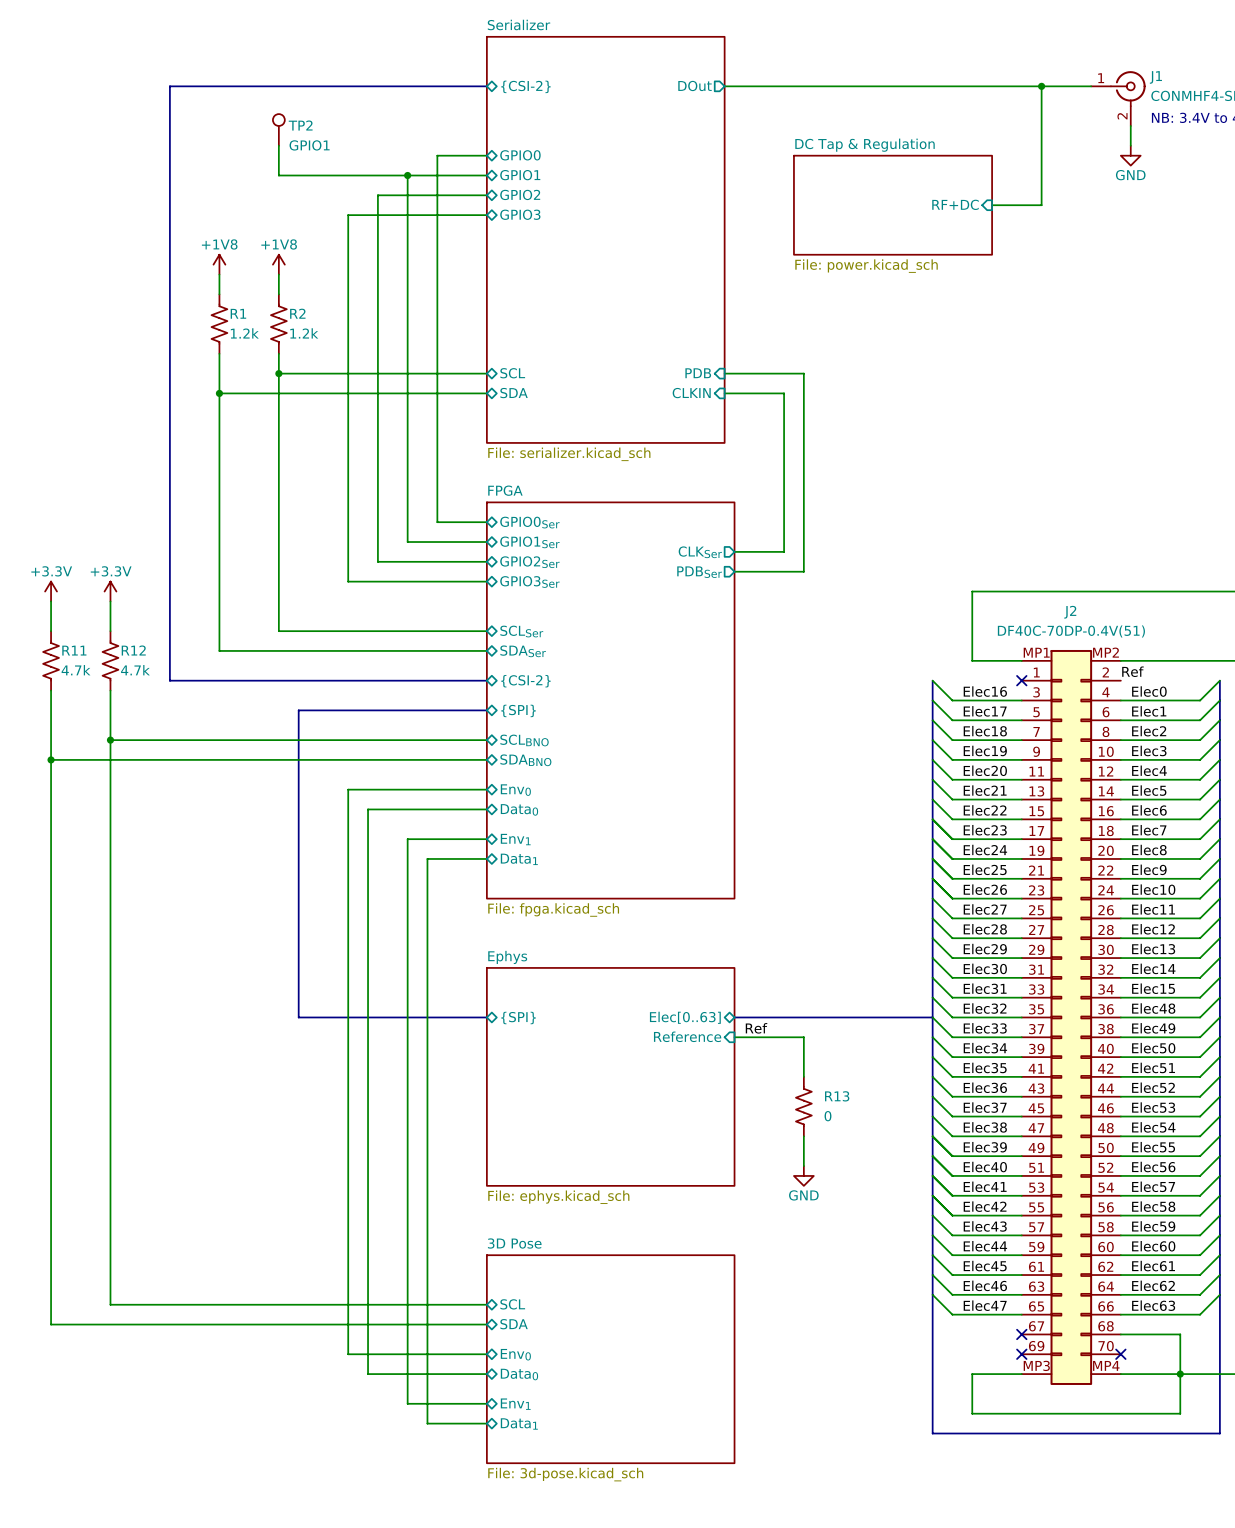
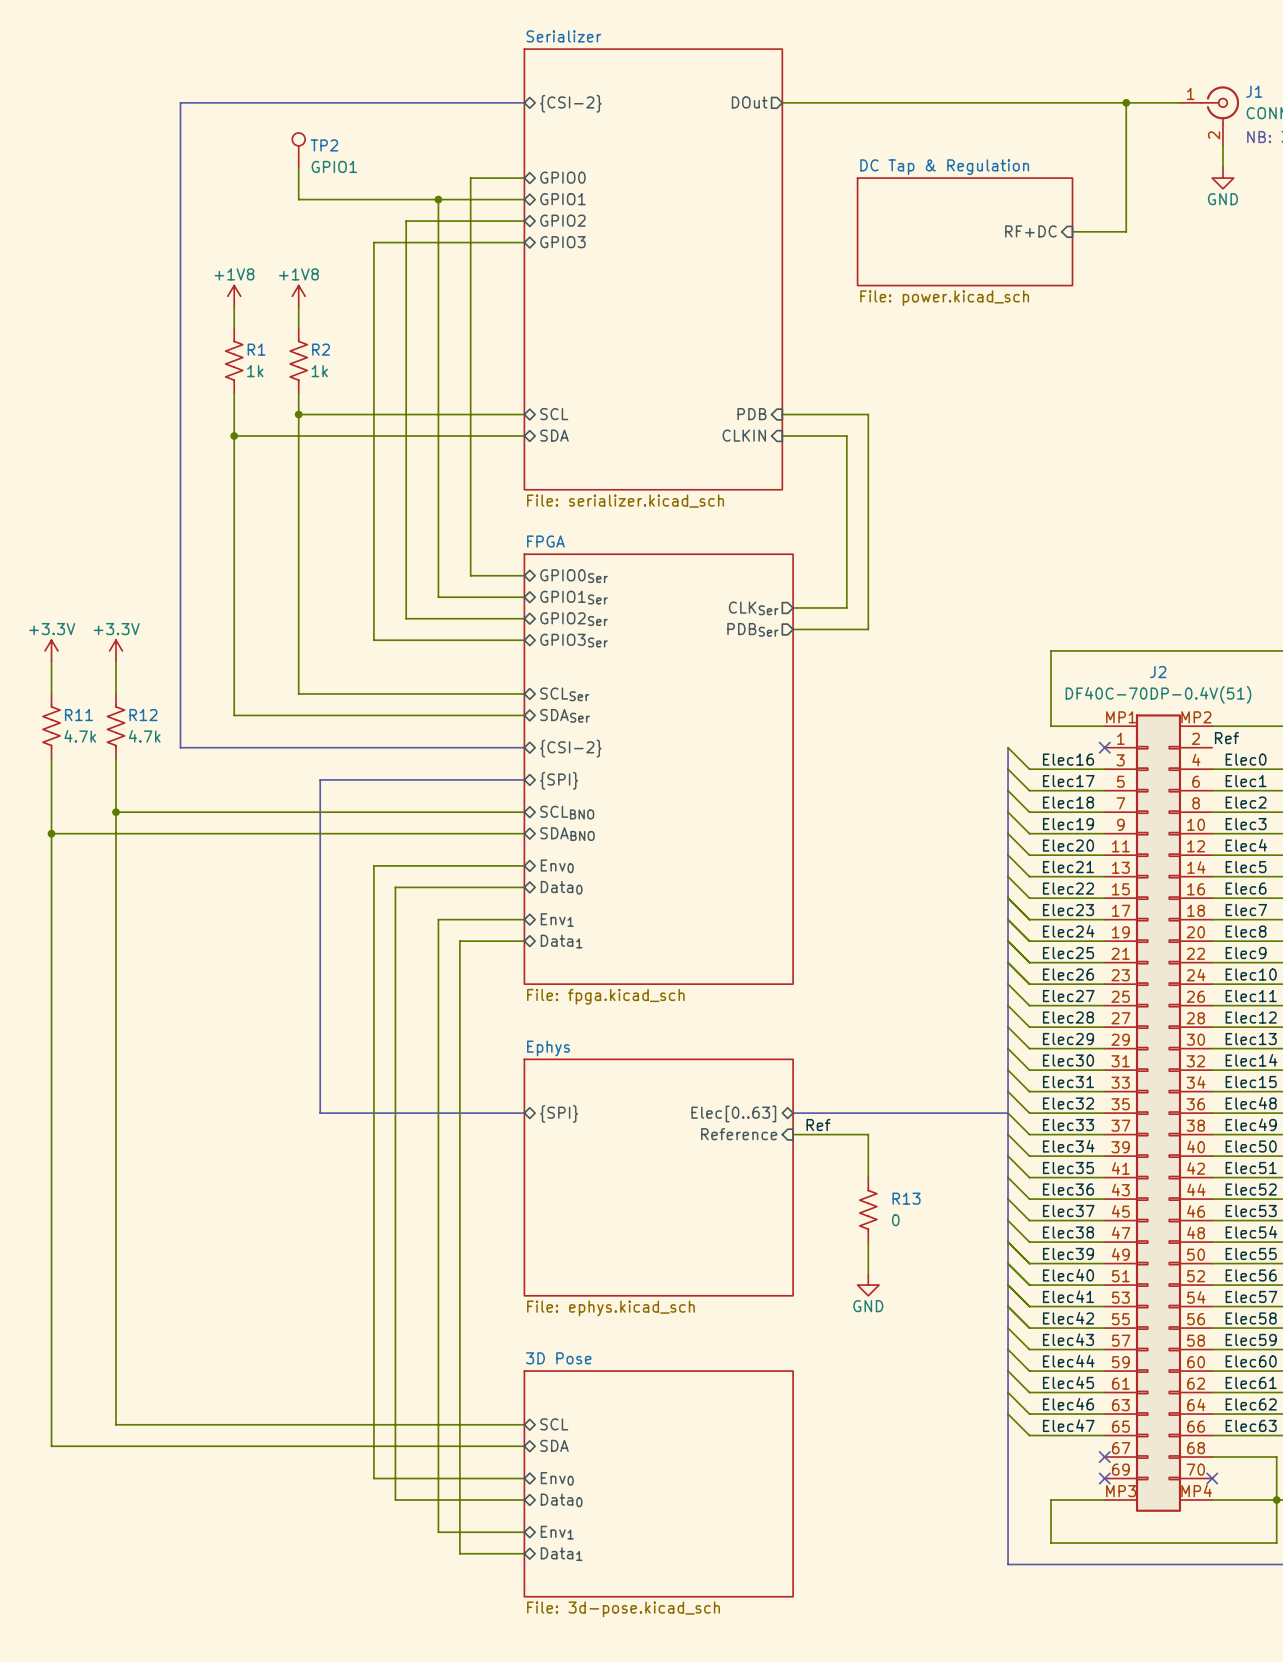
R1 value: 1.2k (244, 333) -> 1k (255, 371)
R2 value: 1.2k (304, 333) -> 1k (319, 371)

